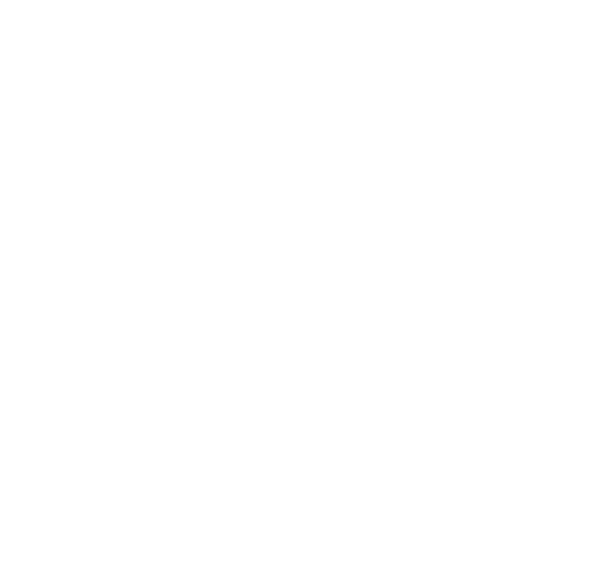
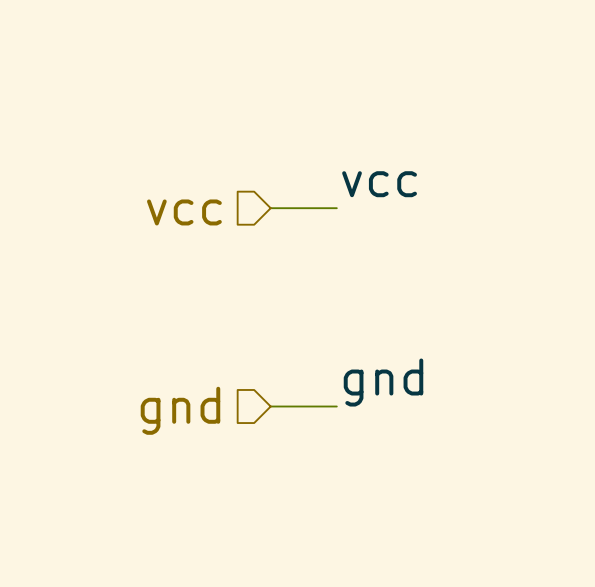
label: none -> vcc (379, 184)
wire: none -> (270, 208) (336, 208)
hierarchical label: none -> vcc (184, 212)
label: none -> gnd (383, 382)
wire: none -> (270, 406) (336, 406)
hierarchical label: none -> gnd (180, 410)

